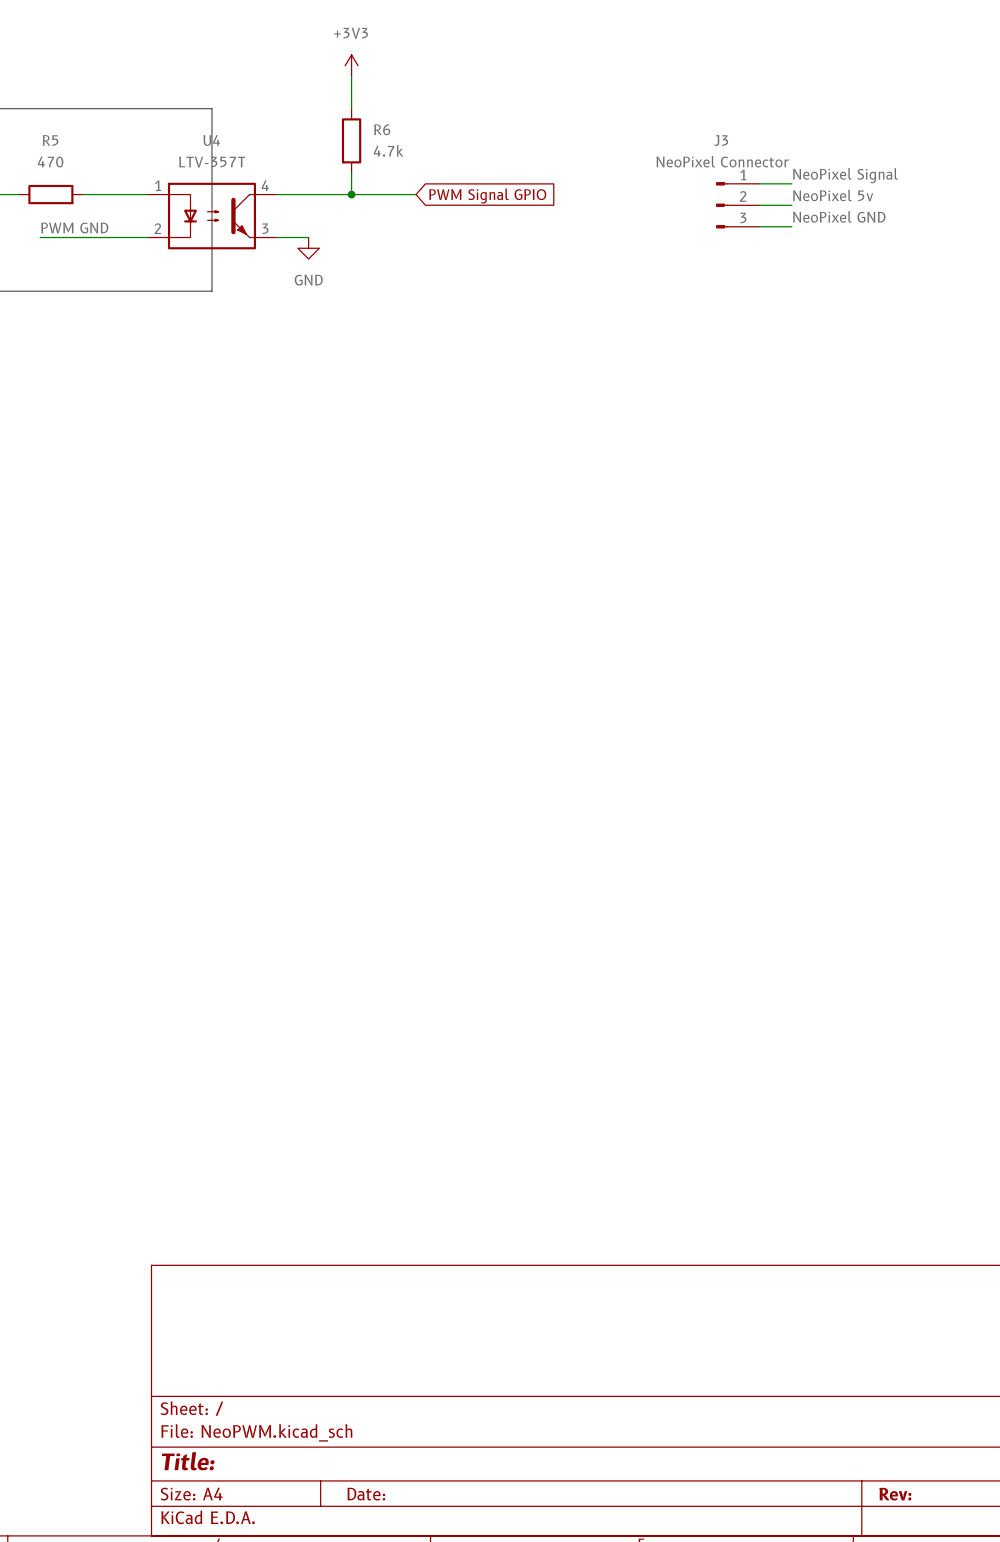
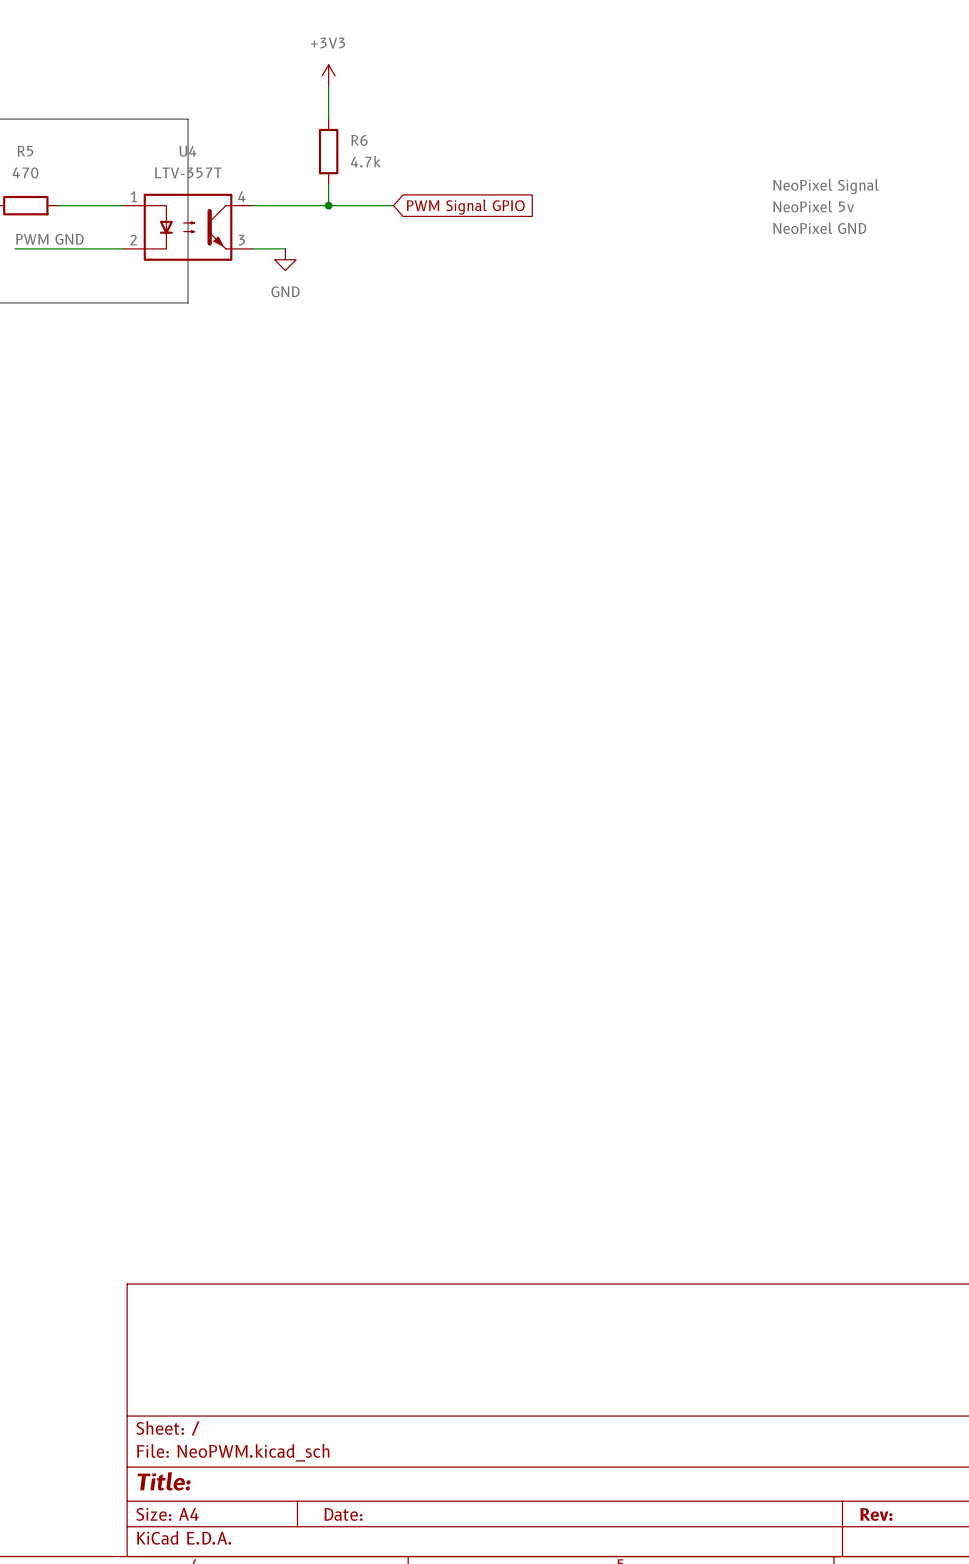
wire: (759, 183) (791, 183) -> none
J3: NeoPixel Connector (737, 205) -> none
wire: (759, 205) (791, 205) -> none
wire: (759, 226) (791, 226) -> none

